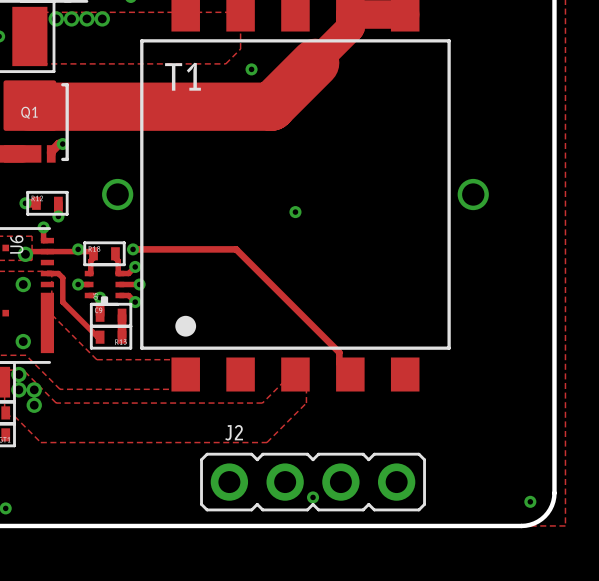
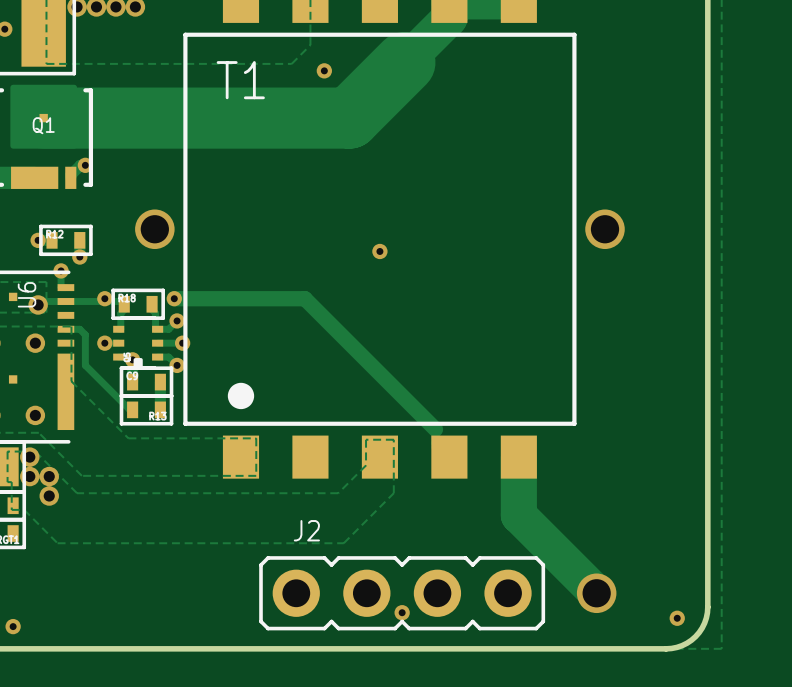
track width: thin (133, 249) (236, 249) (339, 352) -> thick (174, 298) (304, 298) (435, 429)
track: none -> (518, 457) (518, 515) (596, 593)
via: none -> (596, 593)

